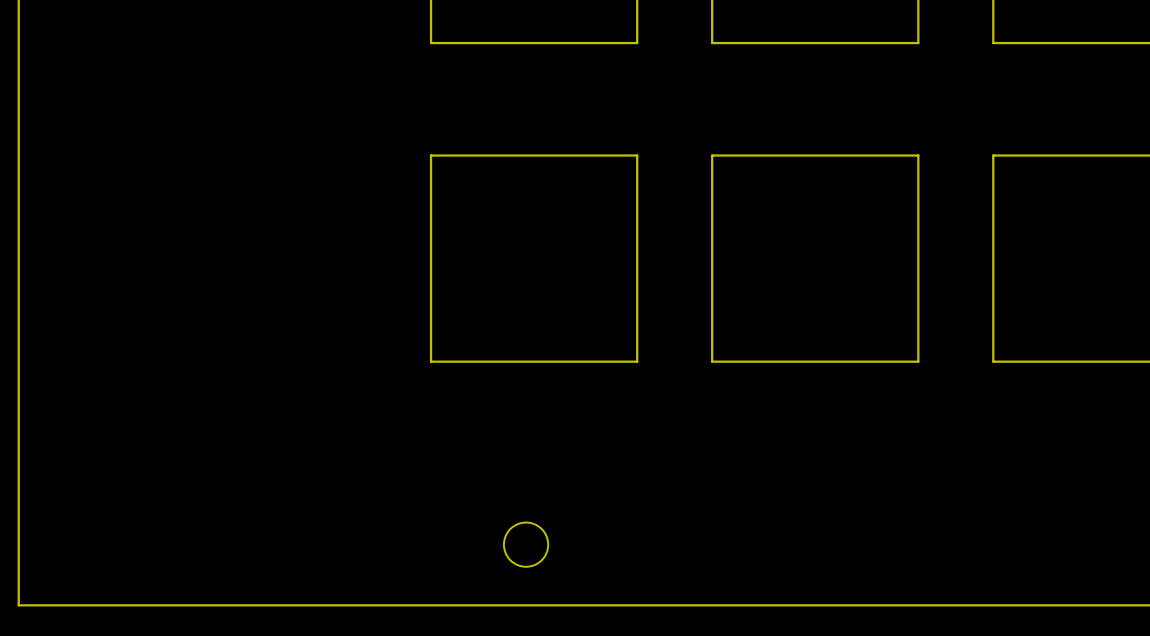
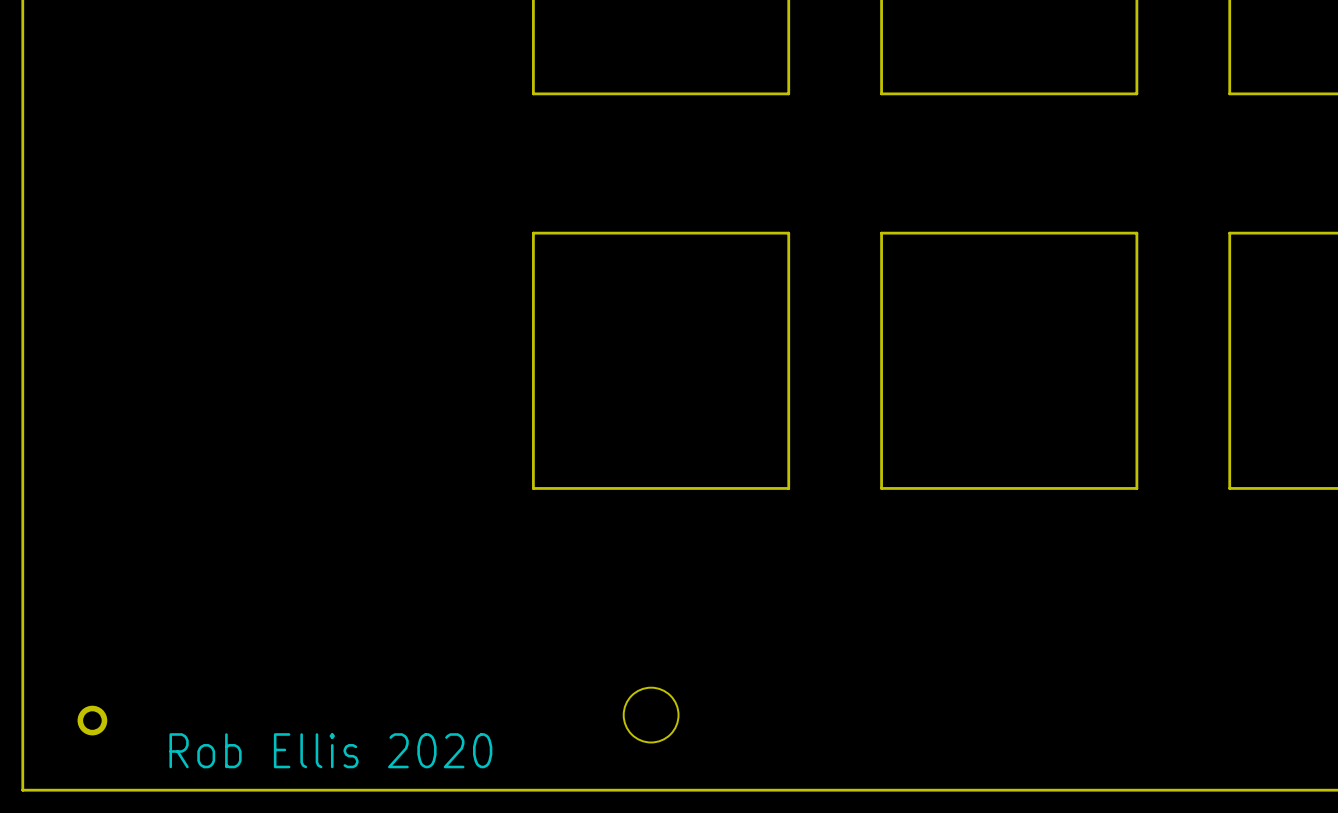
part: none -> (92, 720)
text: none -> Rob Ellis 2020 (330, 750)

